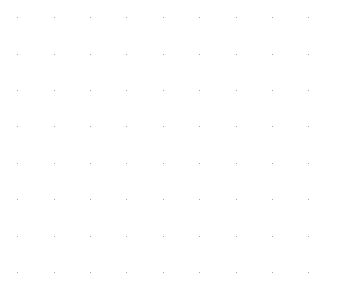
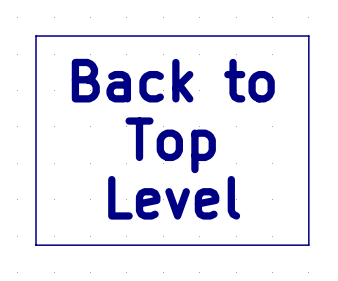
line: none -> (36, 36) (308, 36) (308, 245) (36, 245) (36, 36)
text: none -> Back to (173, 80)
text: none -> Top (170, 145)
text: none -> Level (174, 197)

